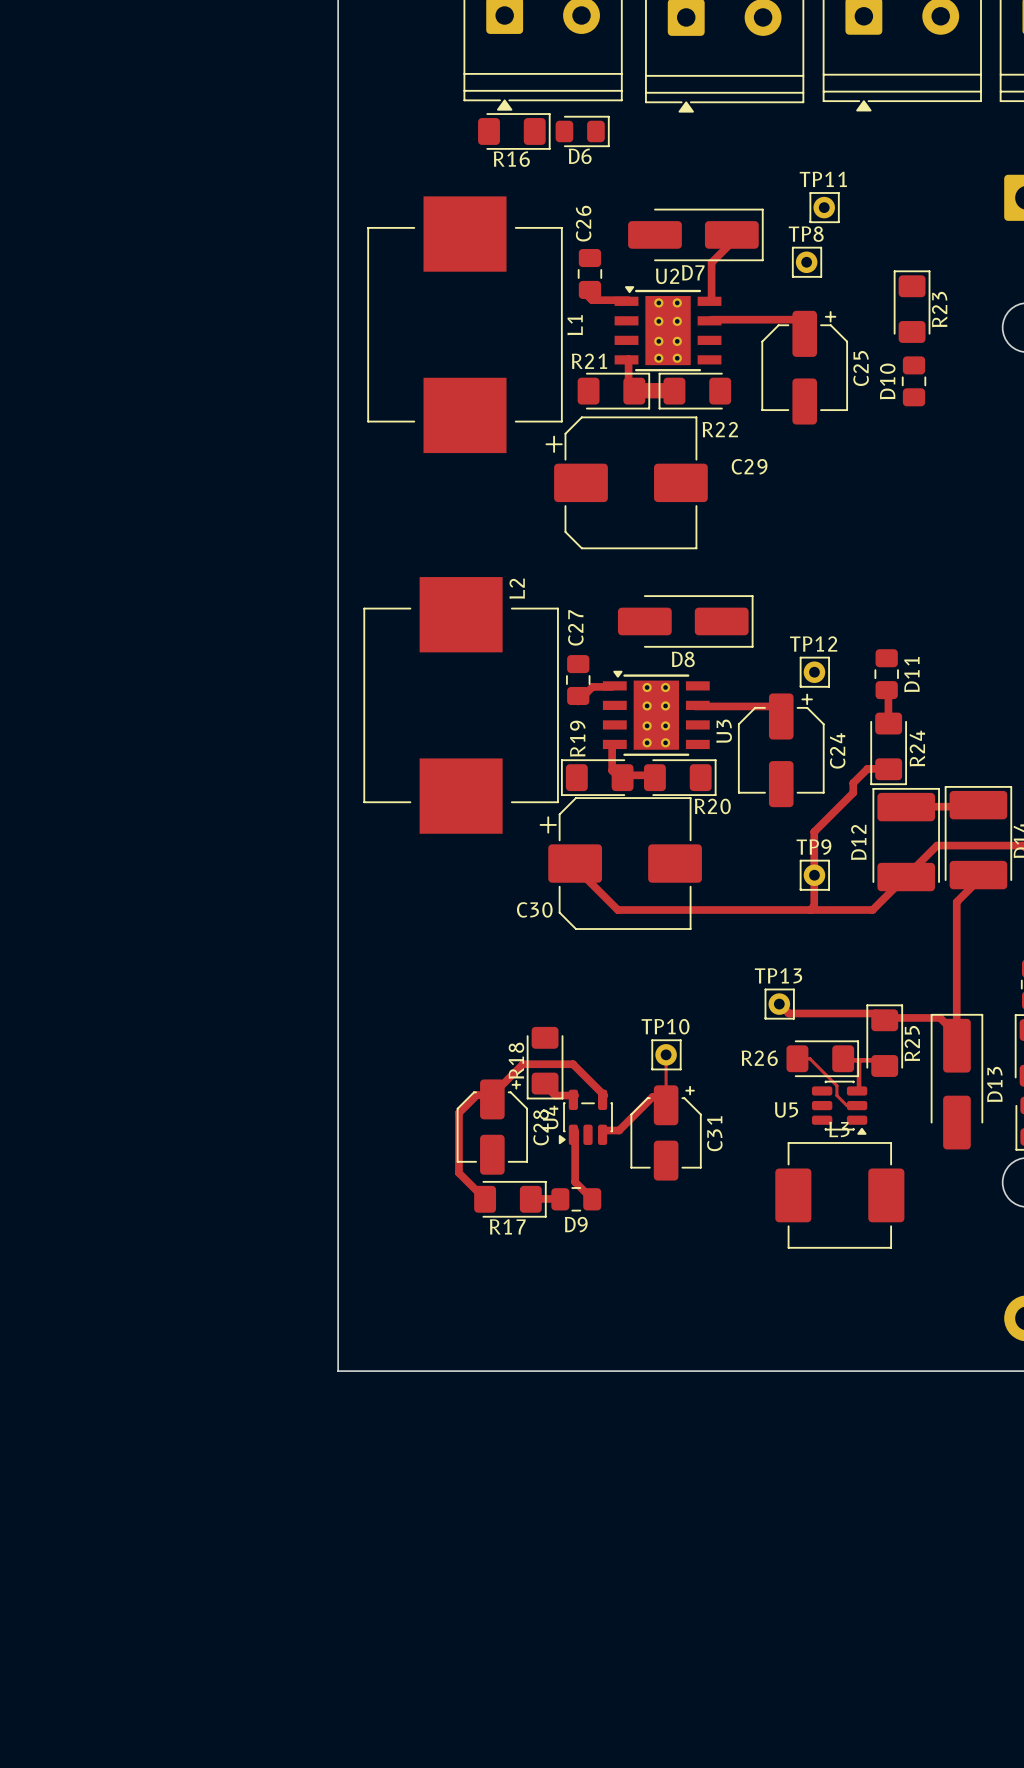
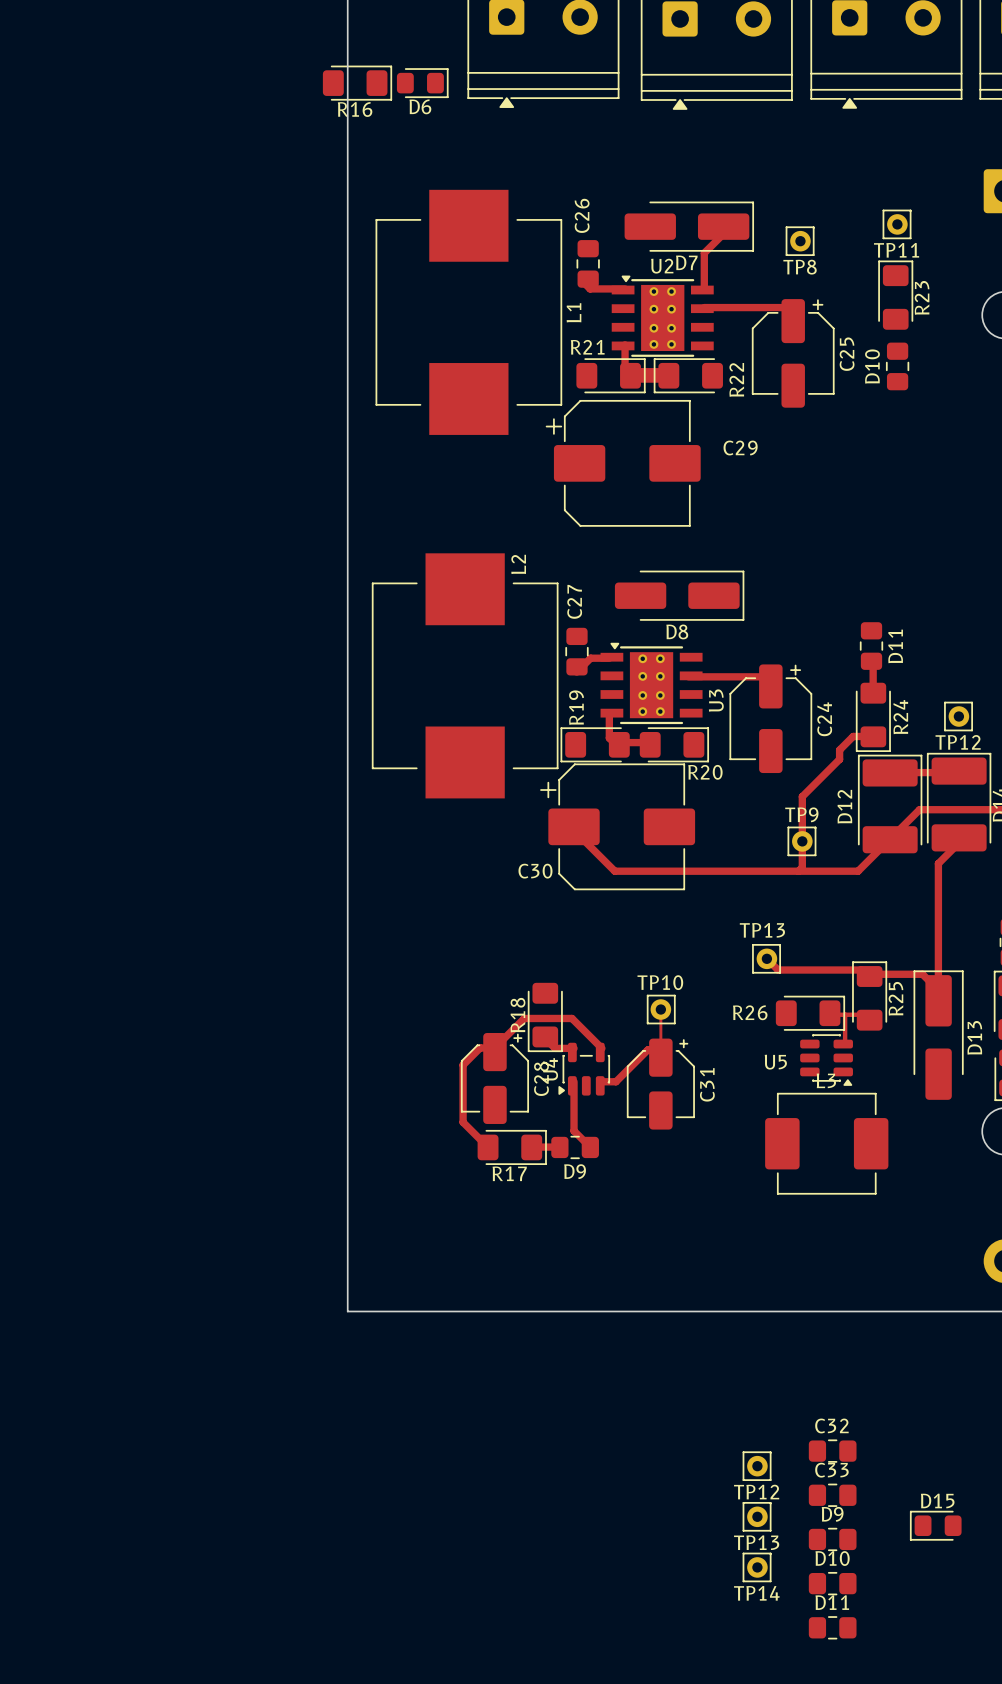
R16 position: (514, 131) -> (357, 83)
D6 position: (582, 131) -> (422, 83)
TP11 rotation: 0° (824, 207) -> 180° (897, 224)
TP11 position: (824, 207) -> (897, 224)
TP8 rotation: 0° (807, 262) -> 180° (800, 241)
R22 name rotation: 0° (720, 429) -> 90° counterclockwise (736, 379)
TP12 rotation: 0° (814, 672) -> 180° (958, 716)
TP12 position: (814, 672) -> (958, 716)
TP9 rotation: 0° (814, 875) -> 180° (801, 841)
TP13 rotation: 0° (779, 1004) -> 180° (766, 958)
track: (797, 1058) (809, 1058) (836, 1085) (836, 1095) (846, 1105) (857, 1105) -> none
C32: none -> (832, 1451)
TP12: none -> (757, 1466)
C33: none -> (832, 1495)
TP13: none -> (757, 1516)
D15: none -> (935, 1525)
D9: none -> (832, 1539)
TP14: none -> (757, 1567)
D10: none -> (832, 1583)
D11: none -> (832, 1627)

